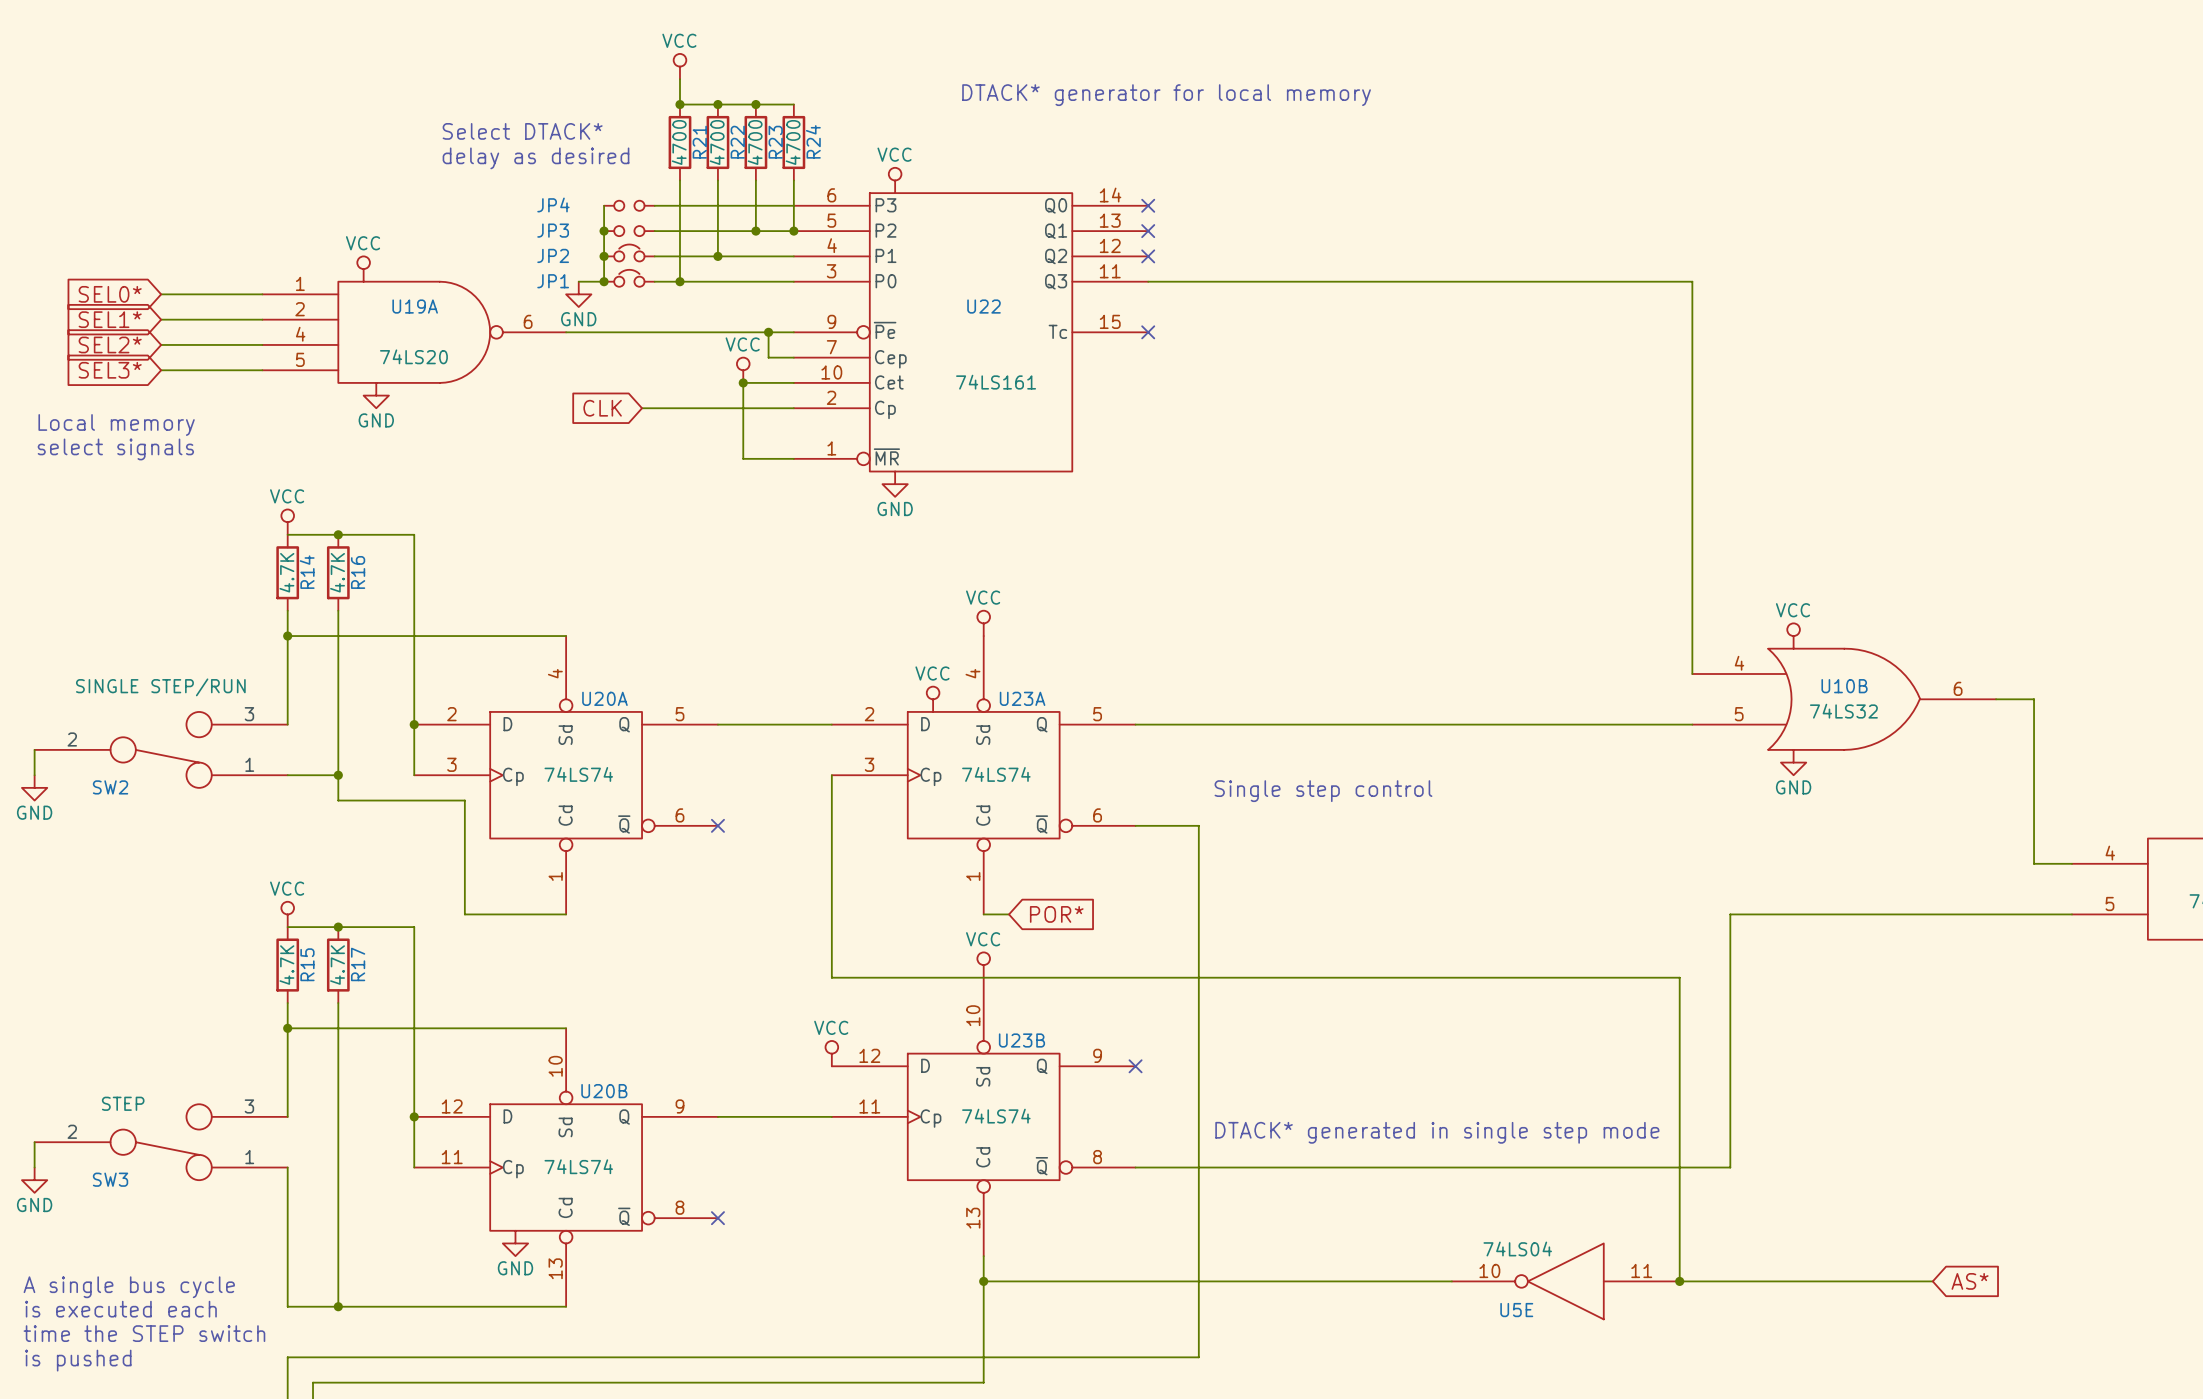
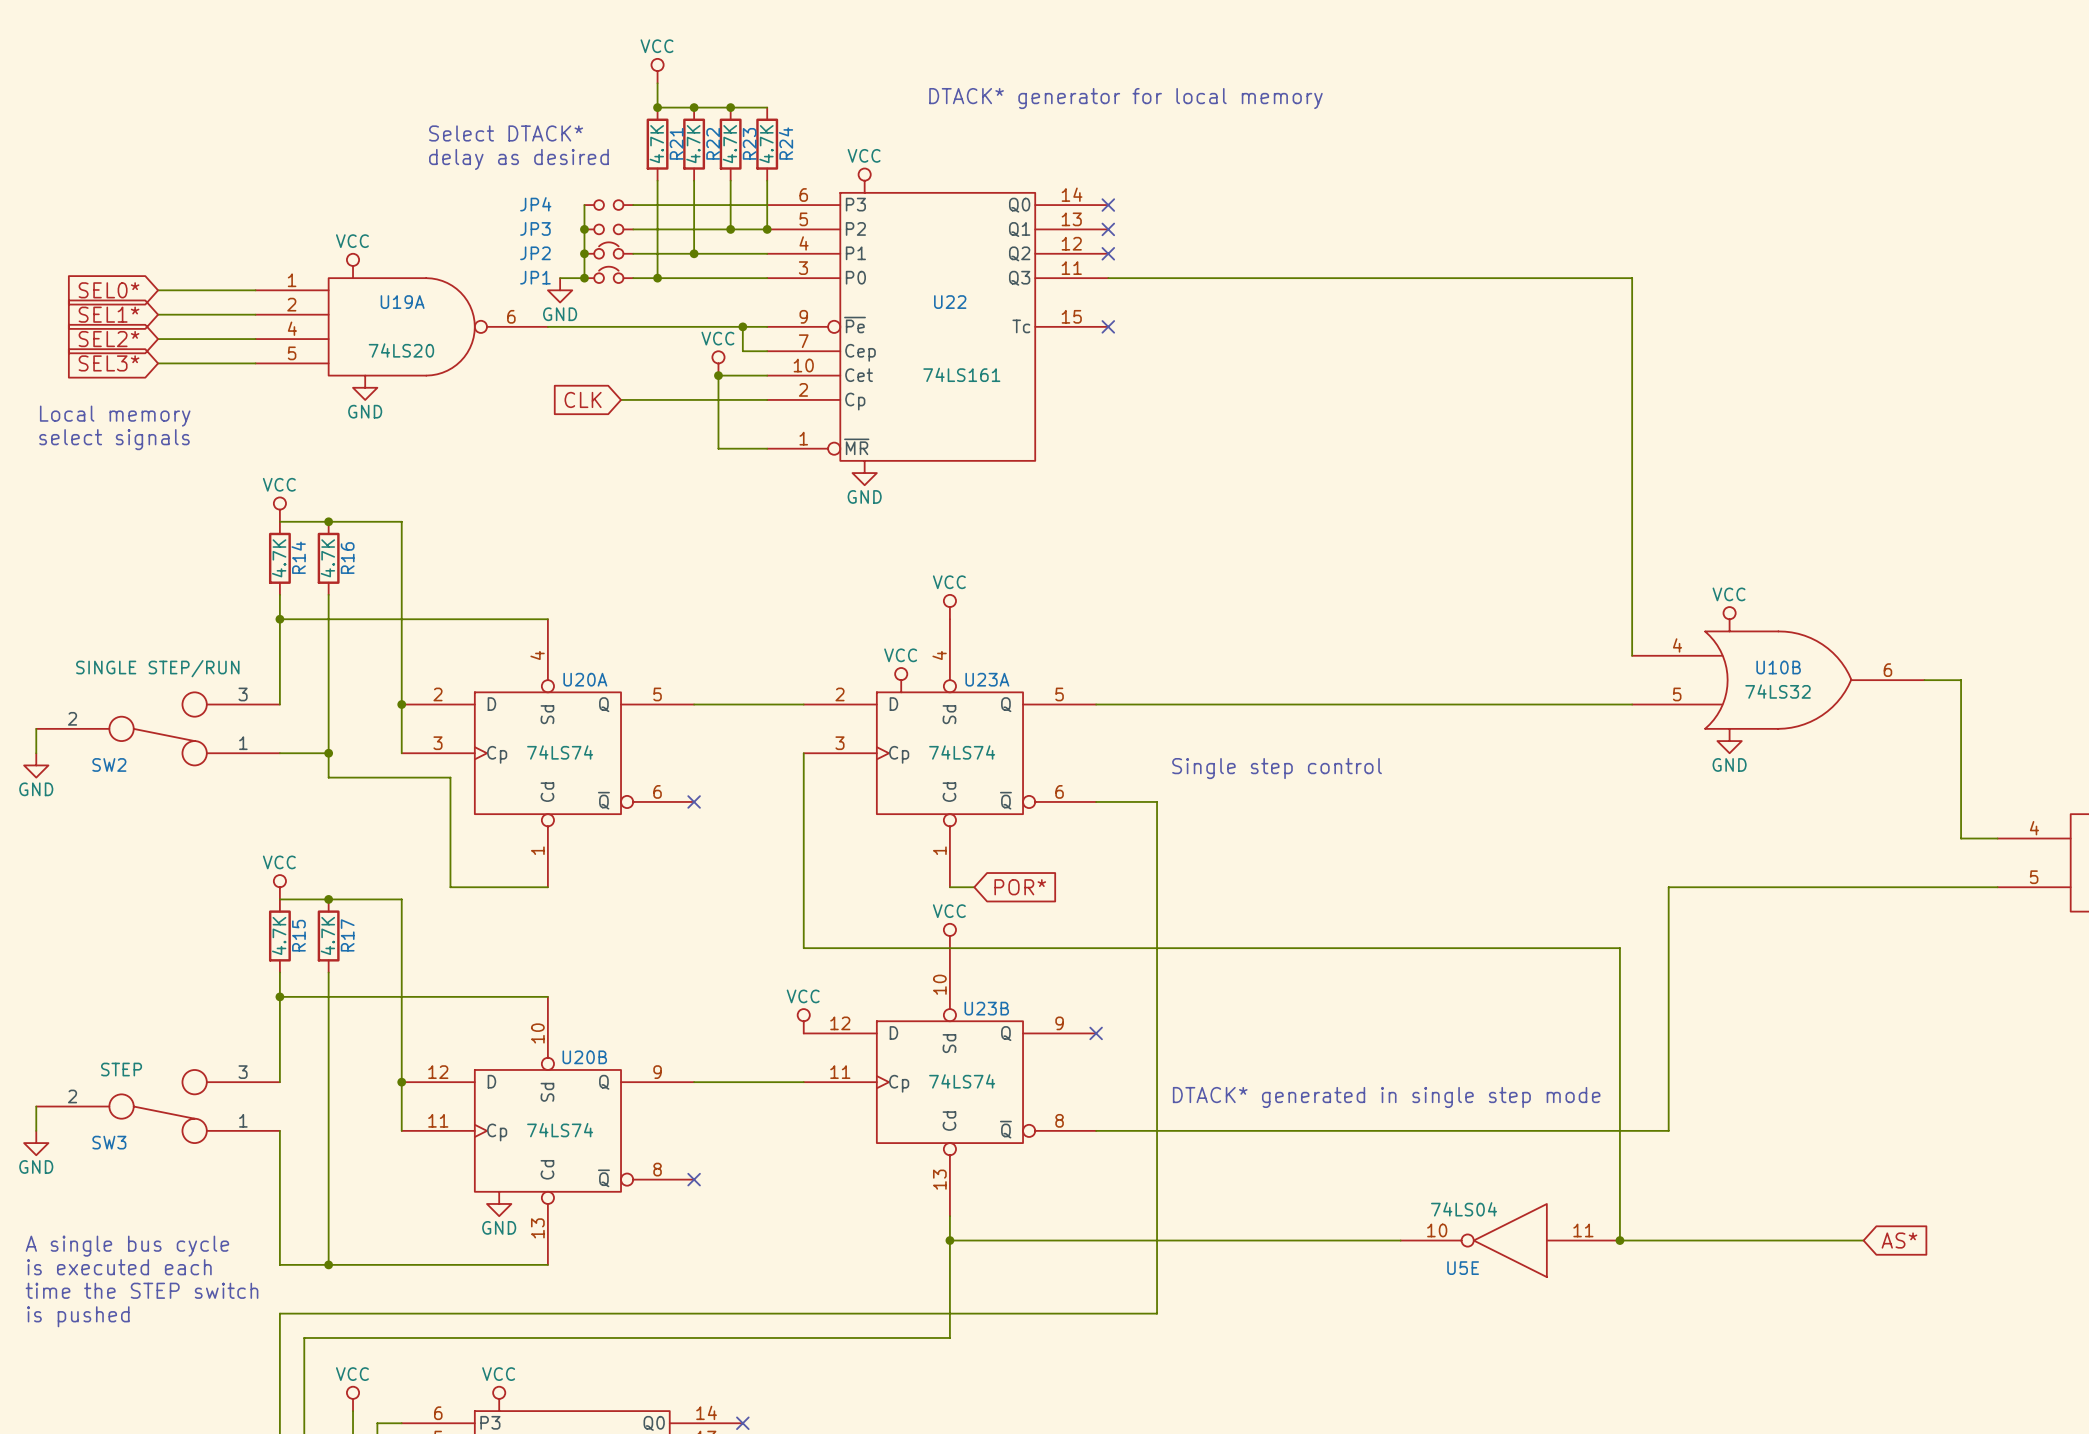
R21 value: 4700 (679, 142) -> 4.7K (656, 144)
R22 value: 4700 (717, 142) -> 4.7K (693, 144)
R23 value: 4700 (755, 142) -> 4.7K (729, 144)
R24 value: 4700 (793, 142) -> 4.7K (766, 144)

